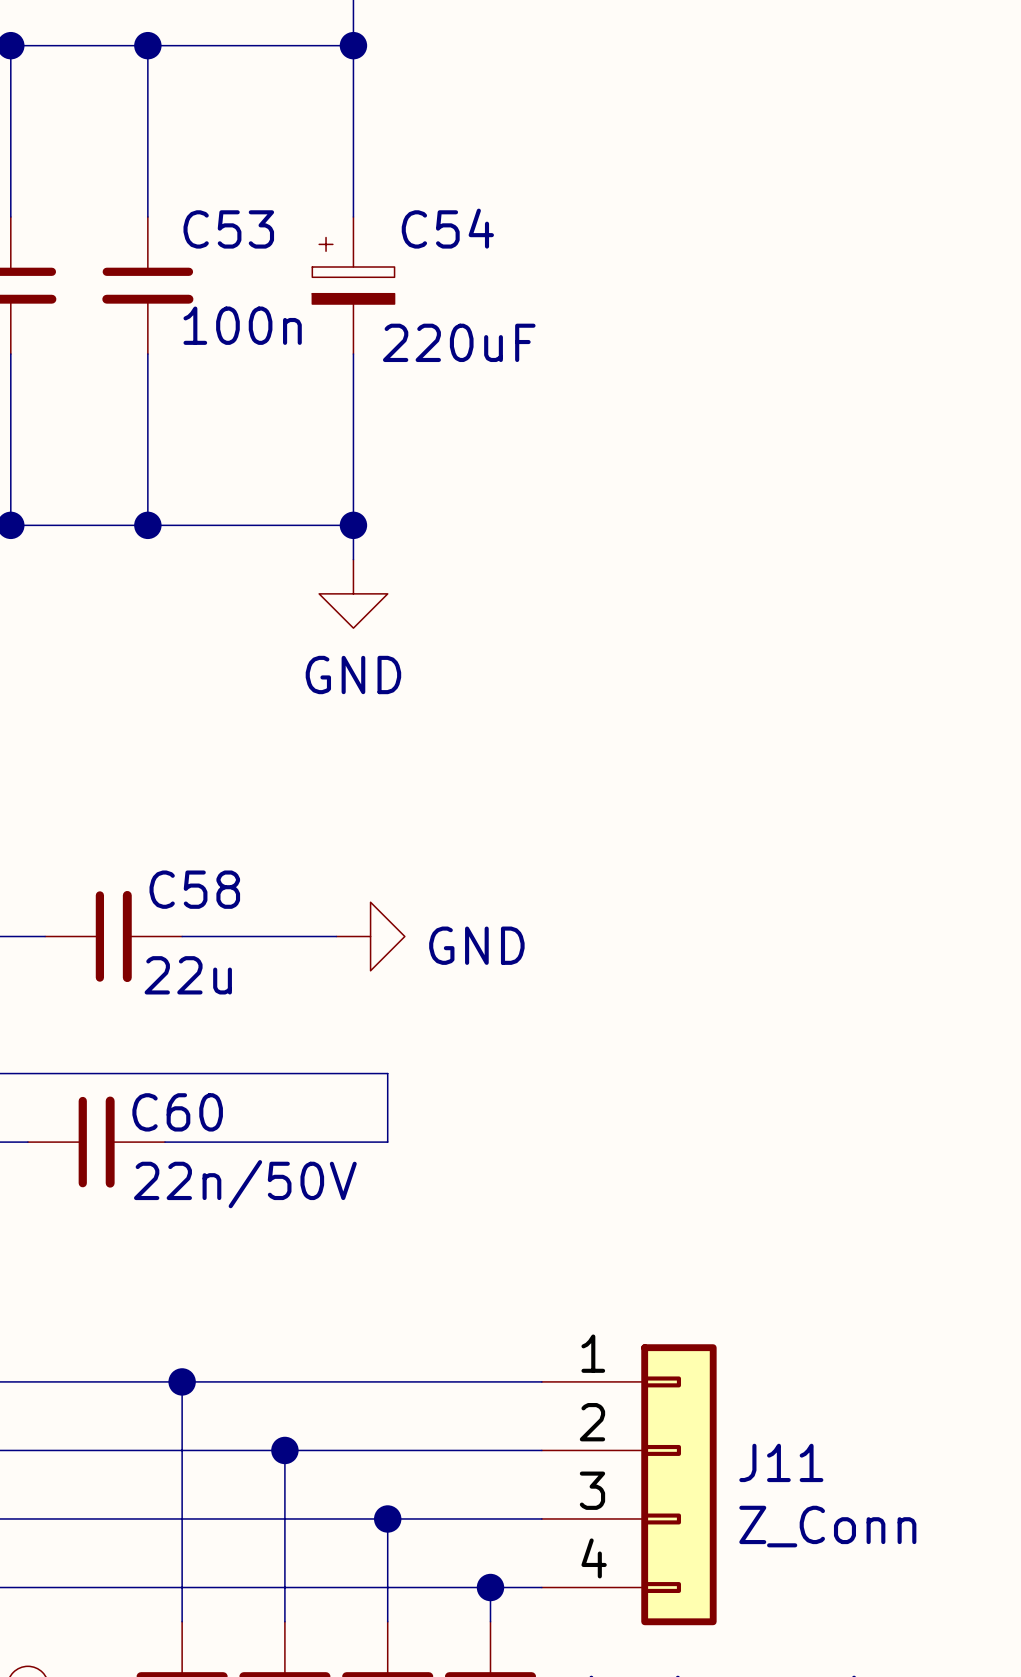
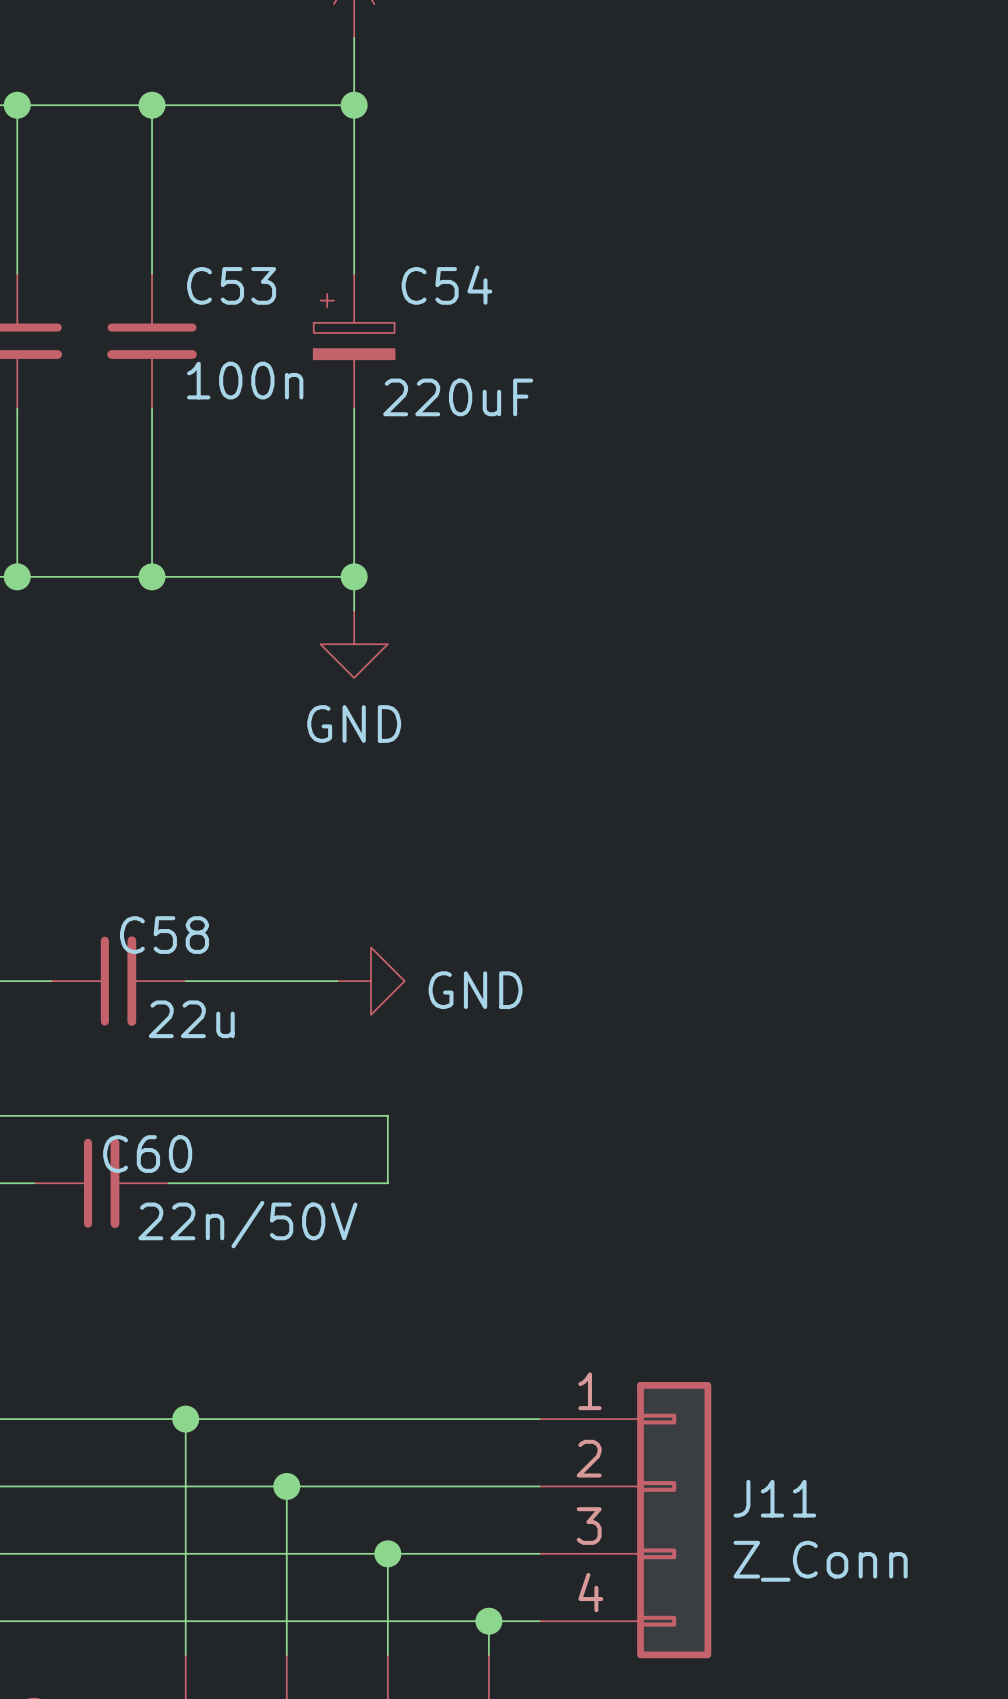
C58 name position: C58 (194, 889) -> C58 (164, 935)
C60 name position: C60 (177, 1112) -> C60 (147, 1154)

